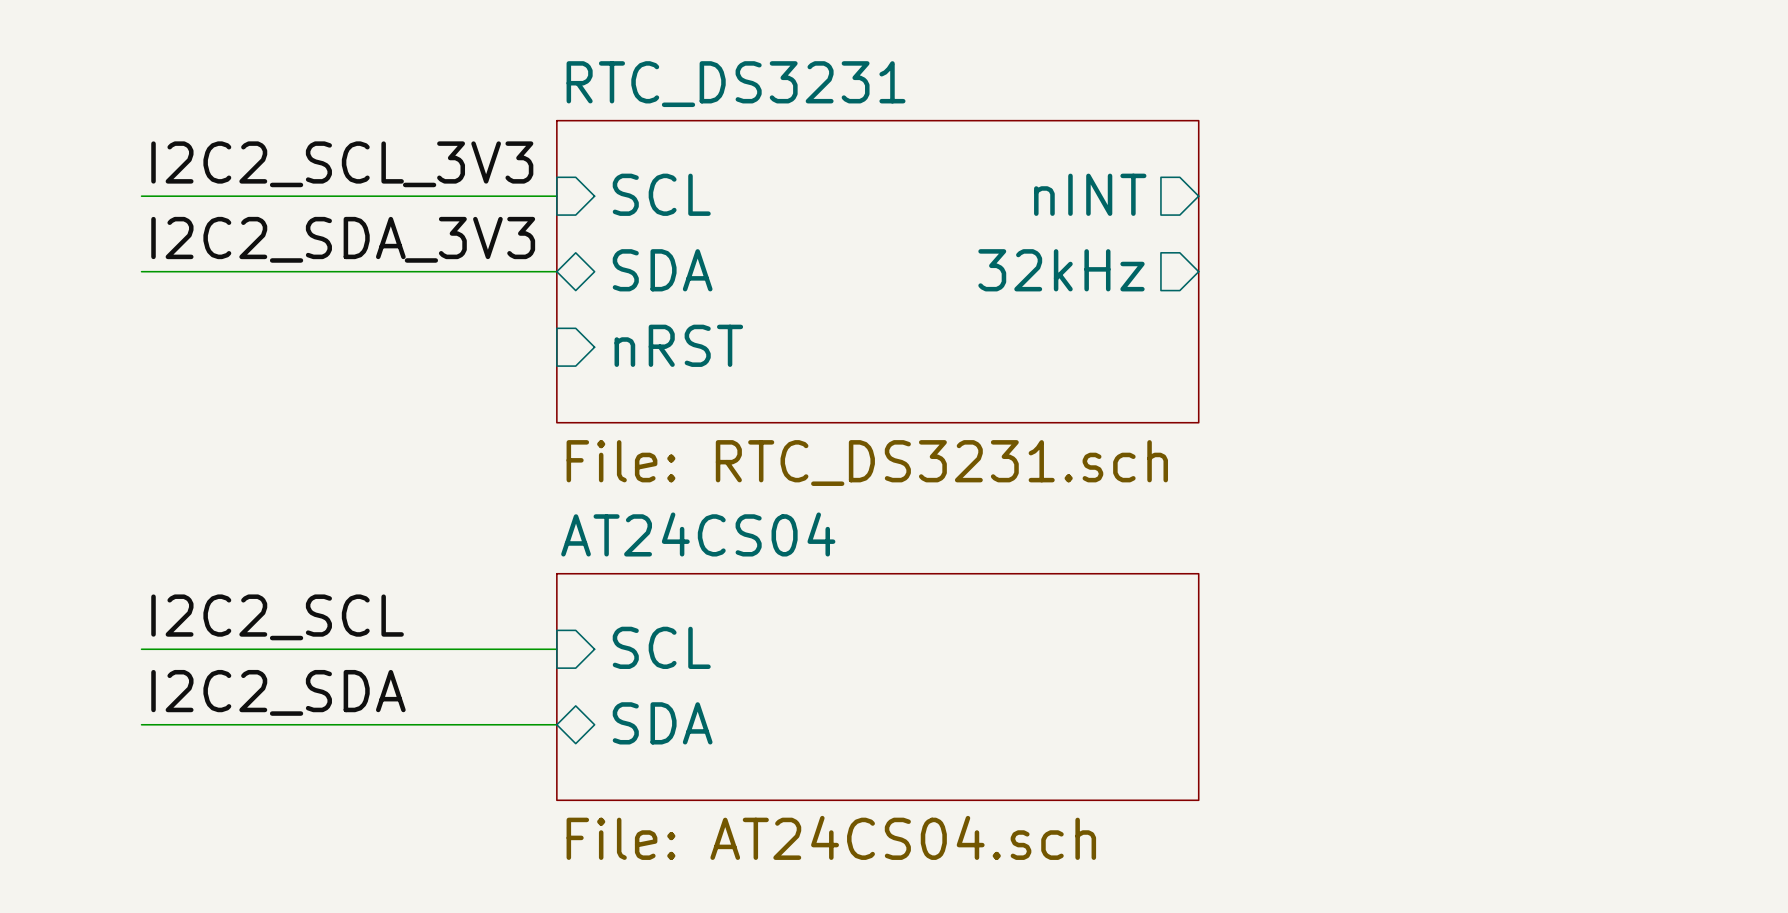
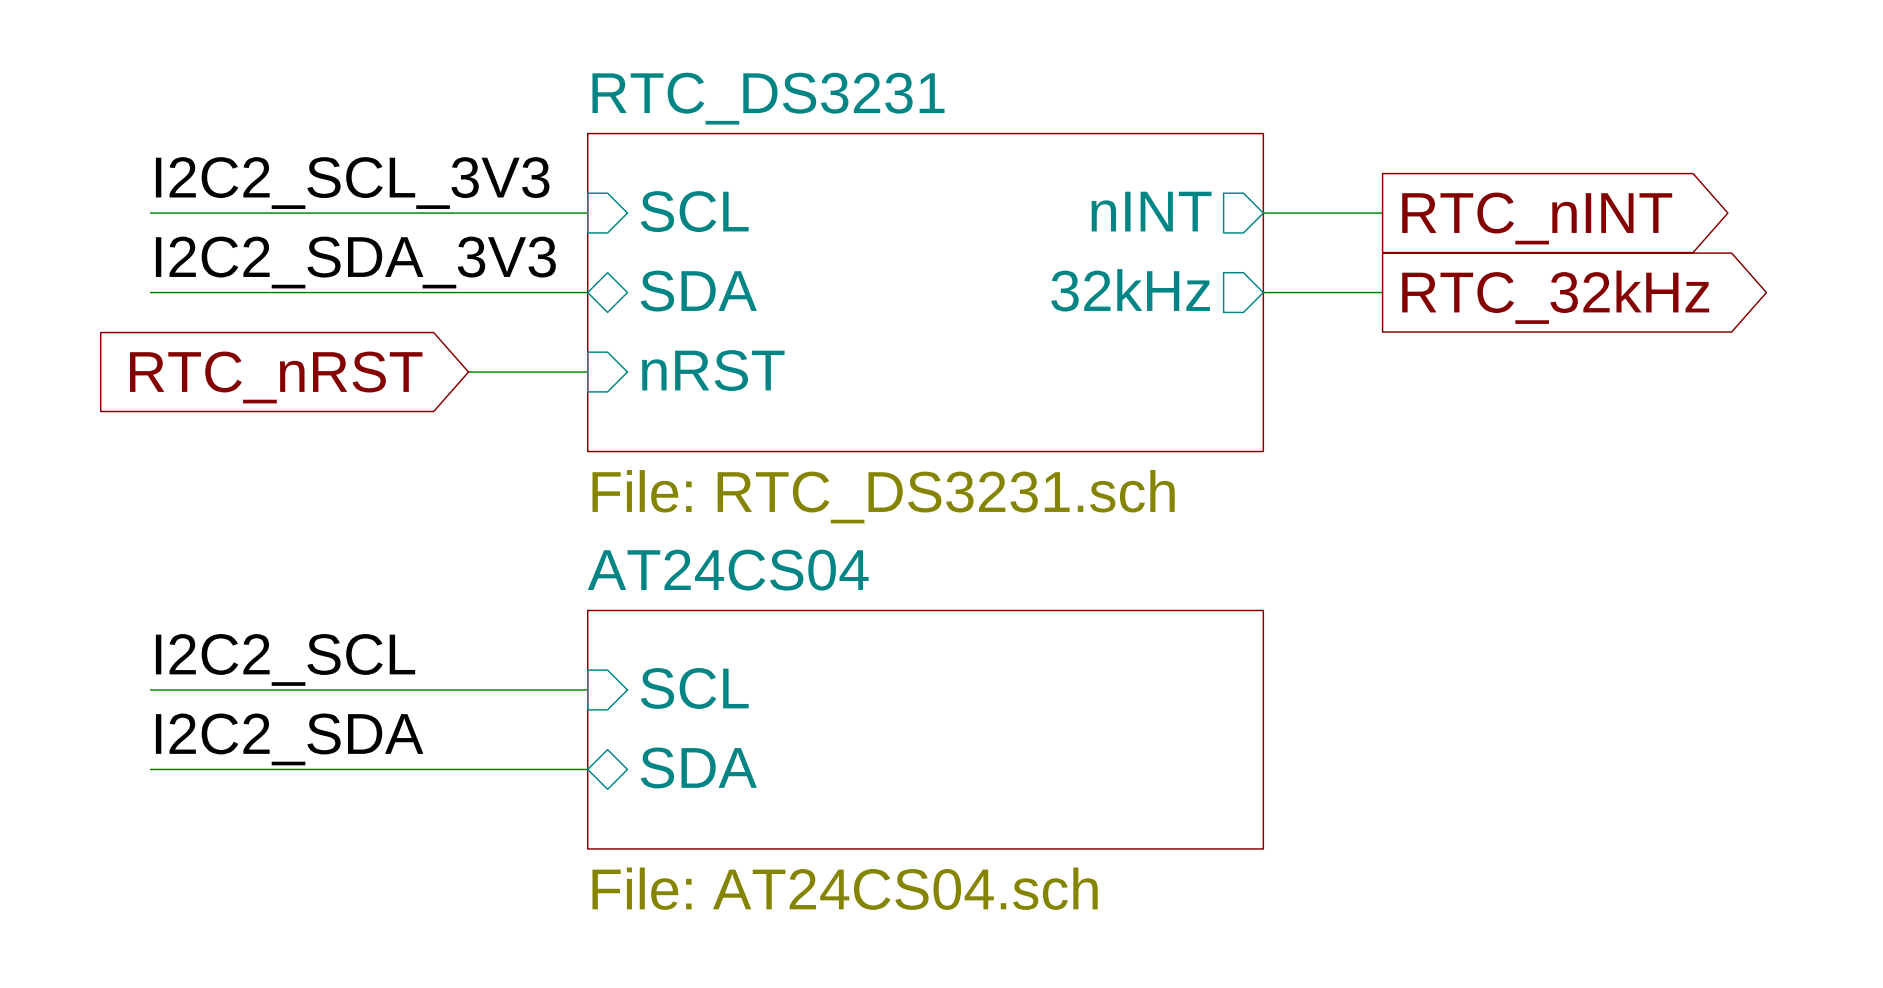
wire: none -> (1263, 213) (1382, 213)
global label: none -> RTC_nINT (1537, 218)
wire: none -> (1263, 292) (1382, 292)
global label: none -> RTC_32kHz (1555, 297)
wire: none -> (468, 372) (587, 372)
global label: none -> RTC_nRST (276, 377)

